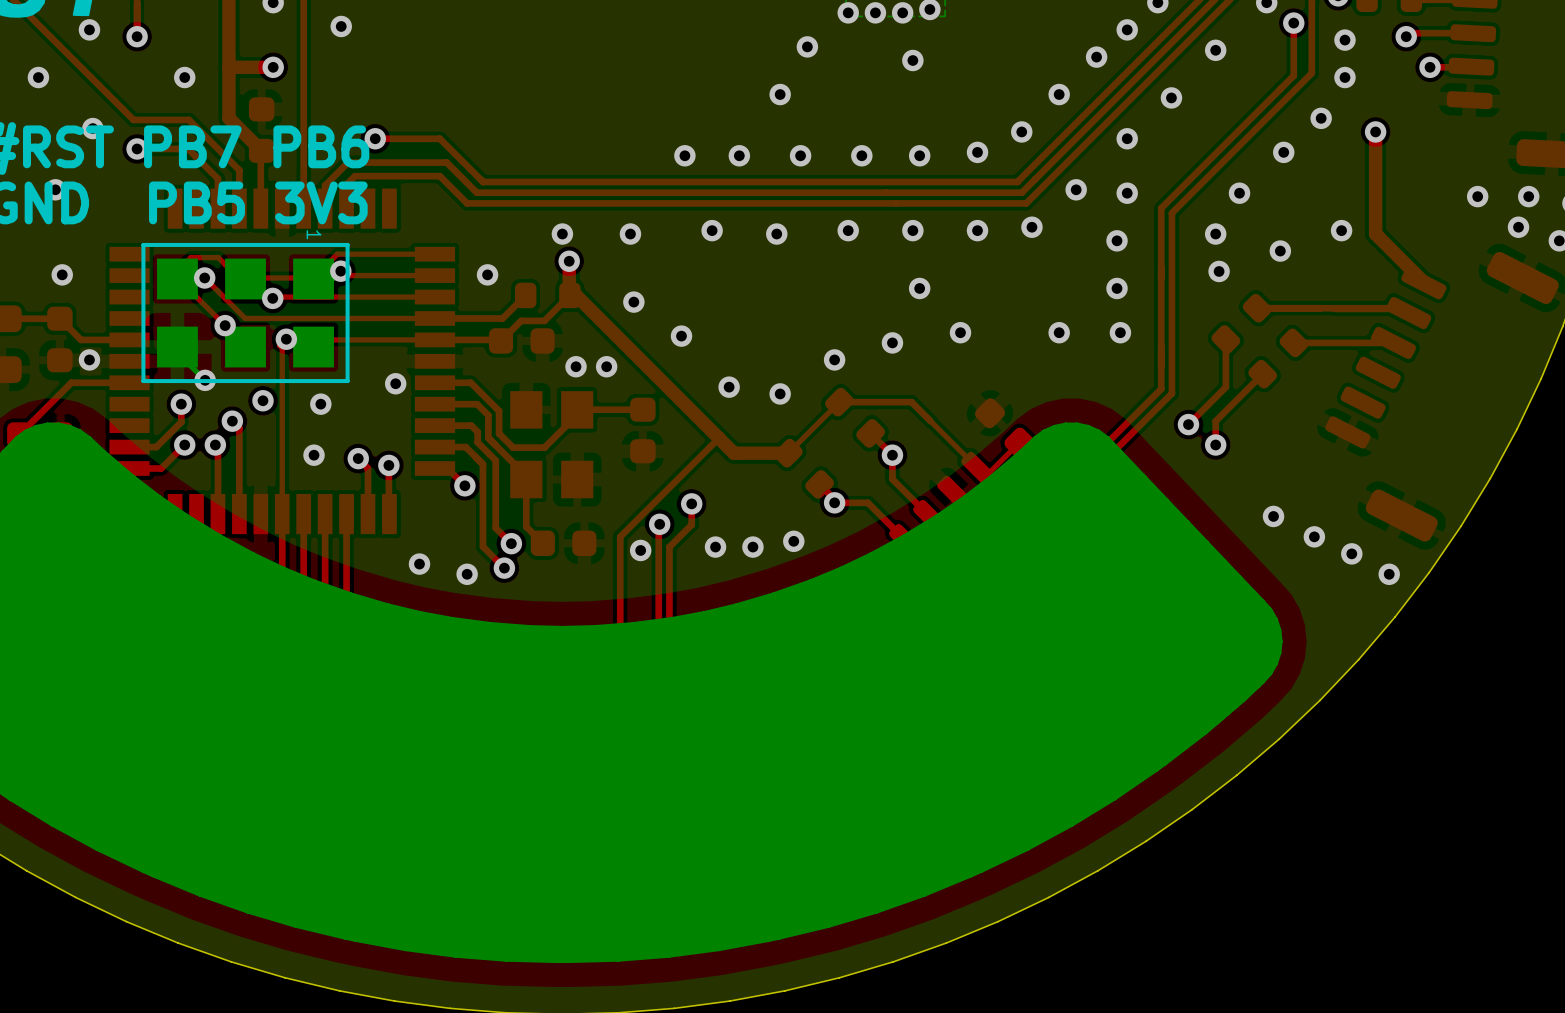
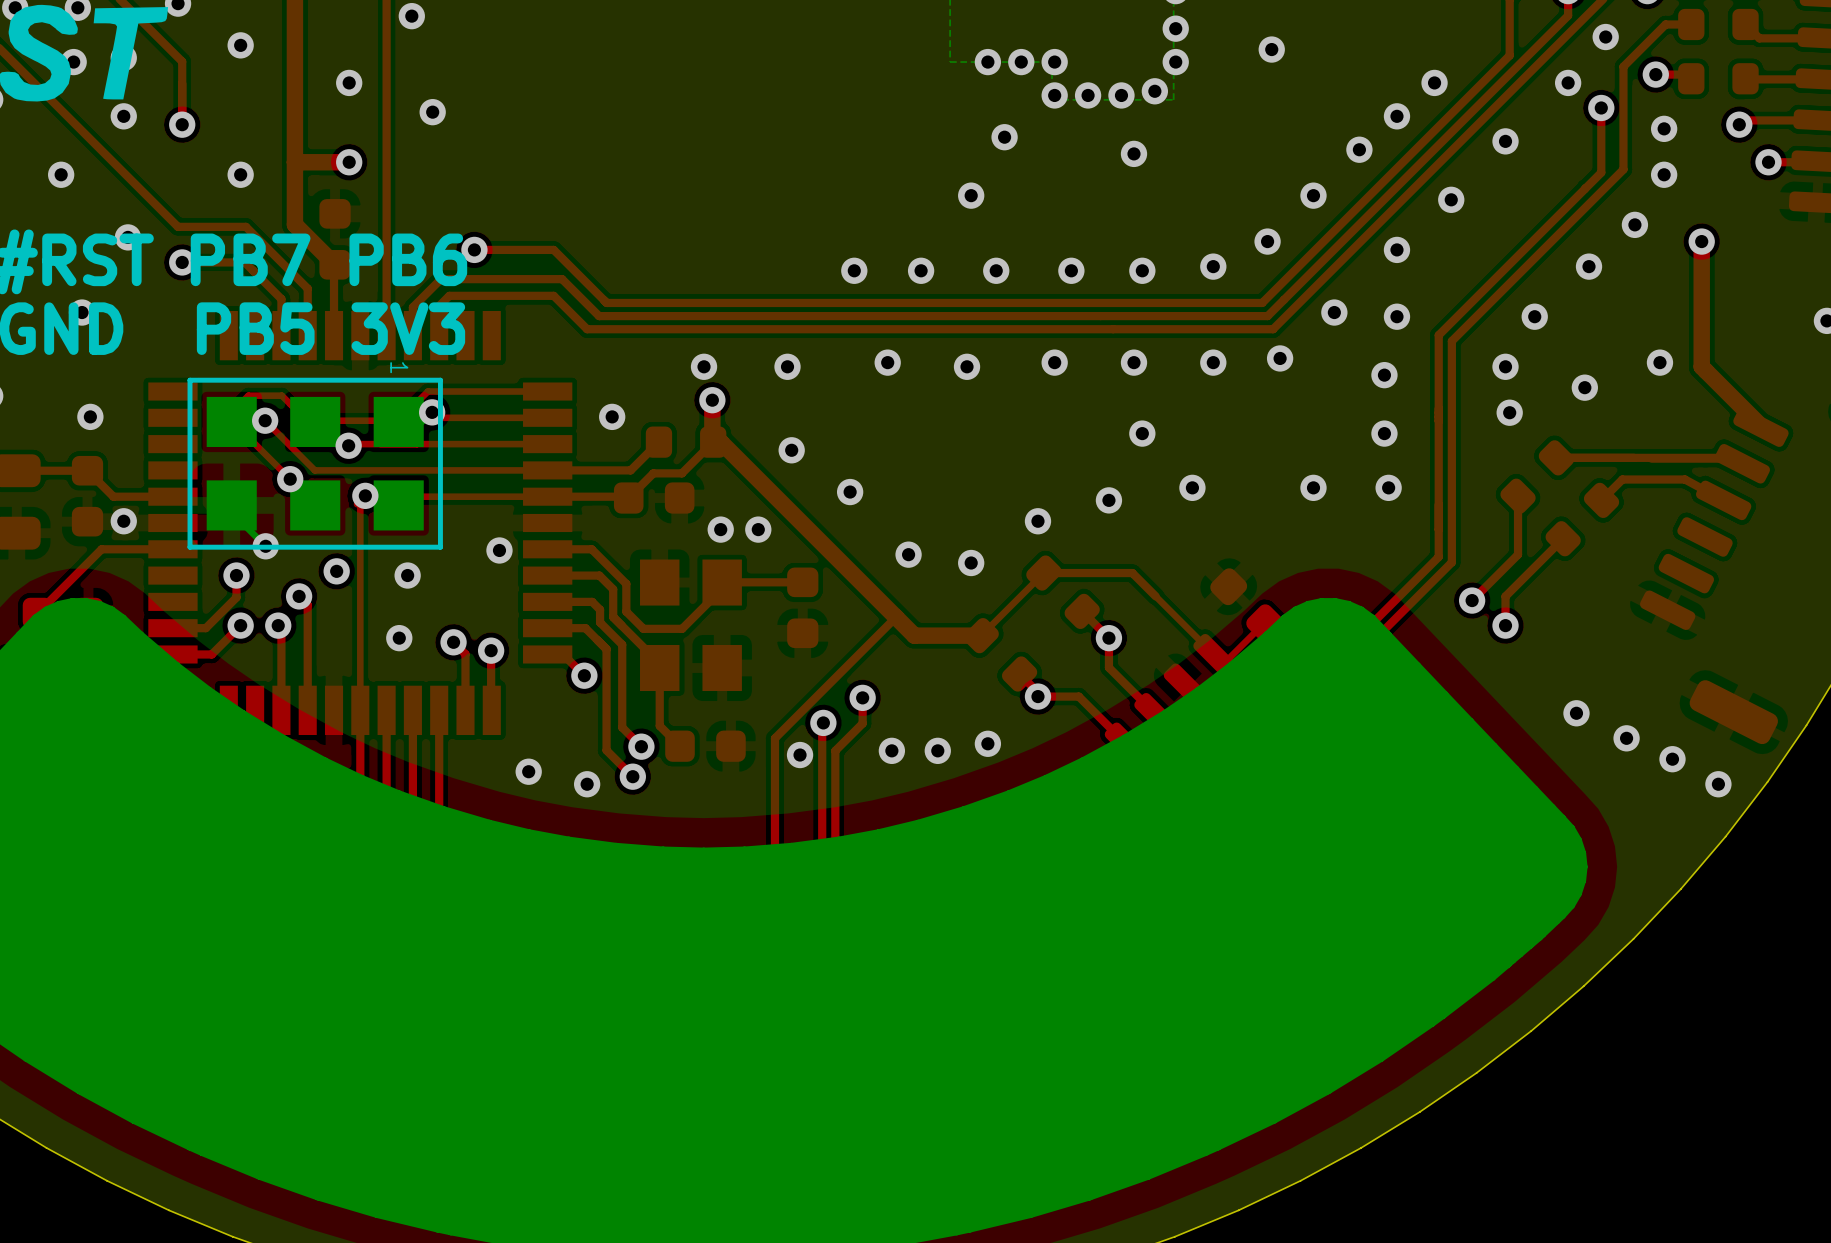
top track: (1393, 342) (1293, 342) -> (1723, 500) (1685, 479) (1622, 479) (1601, 500)

